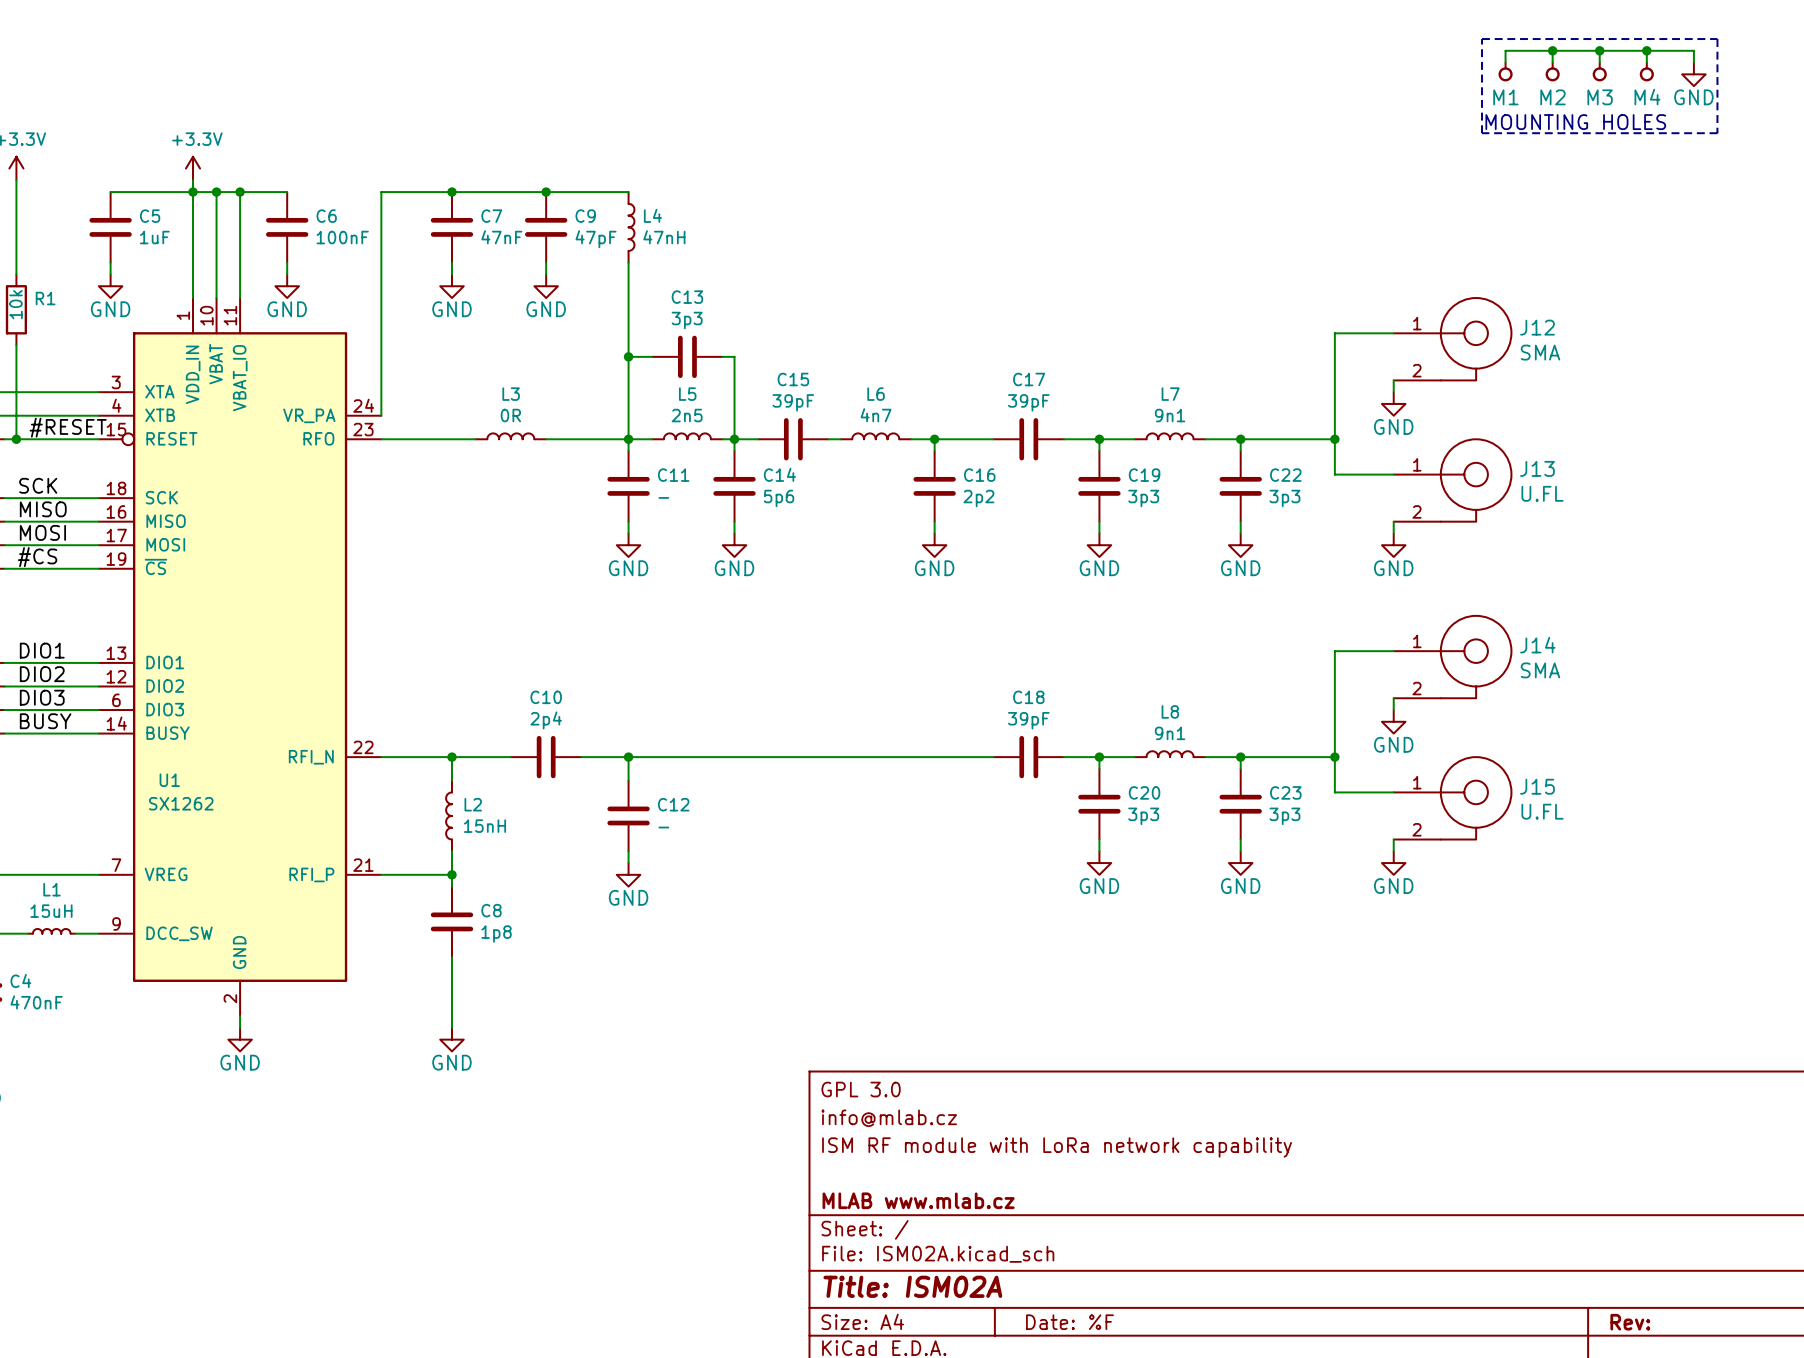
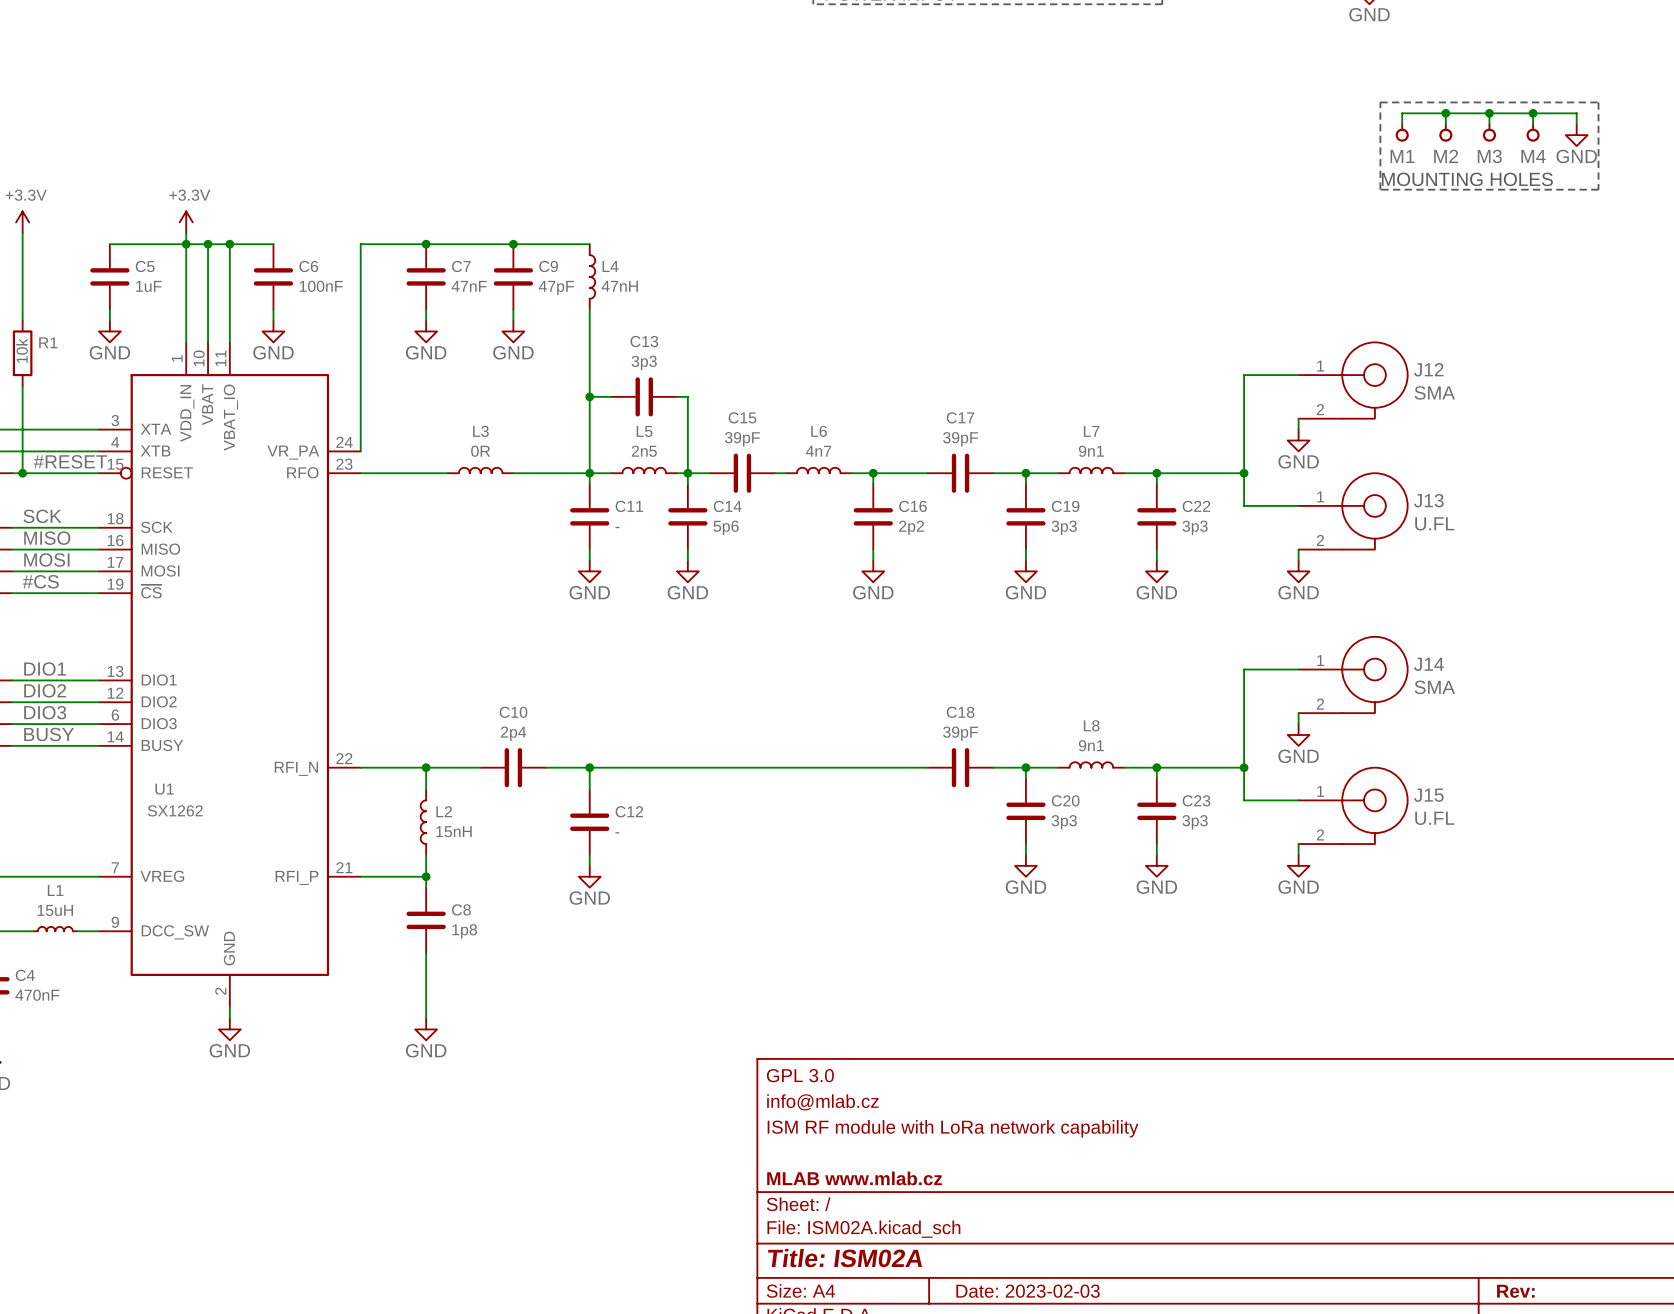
title block: Date: %F (1069, 1322) -> Date: 2023-02-03 (1028, 1291)

